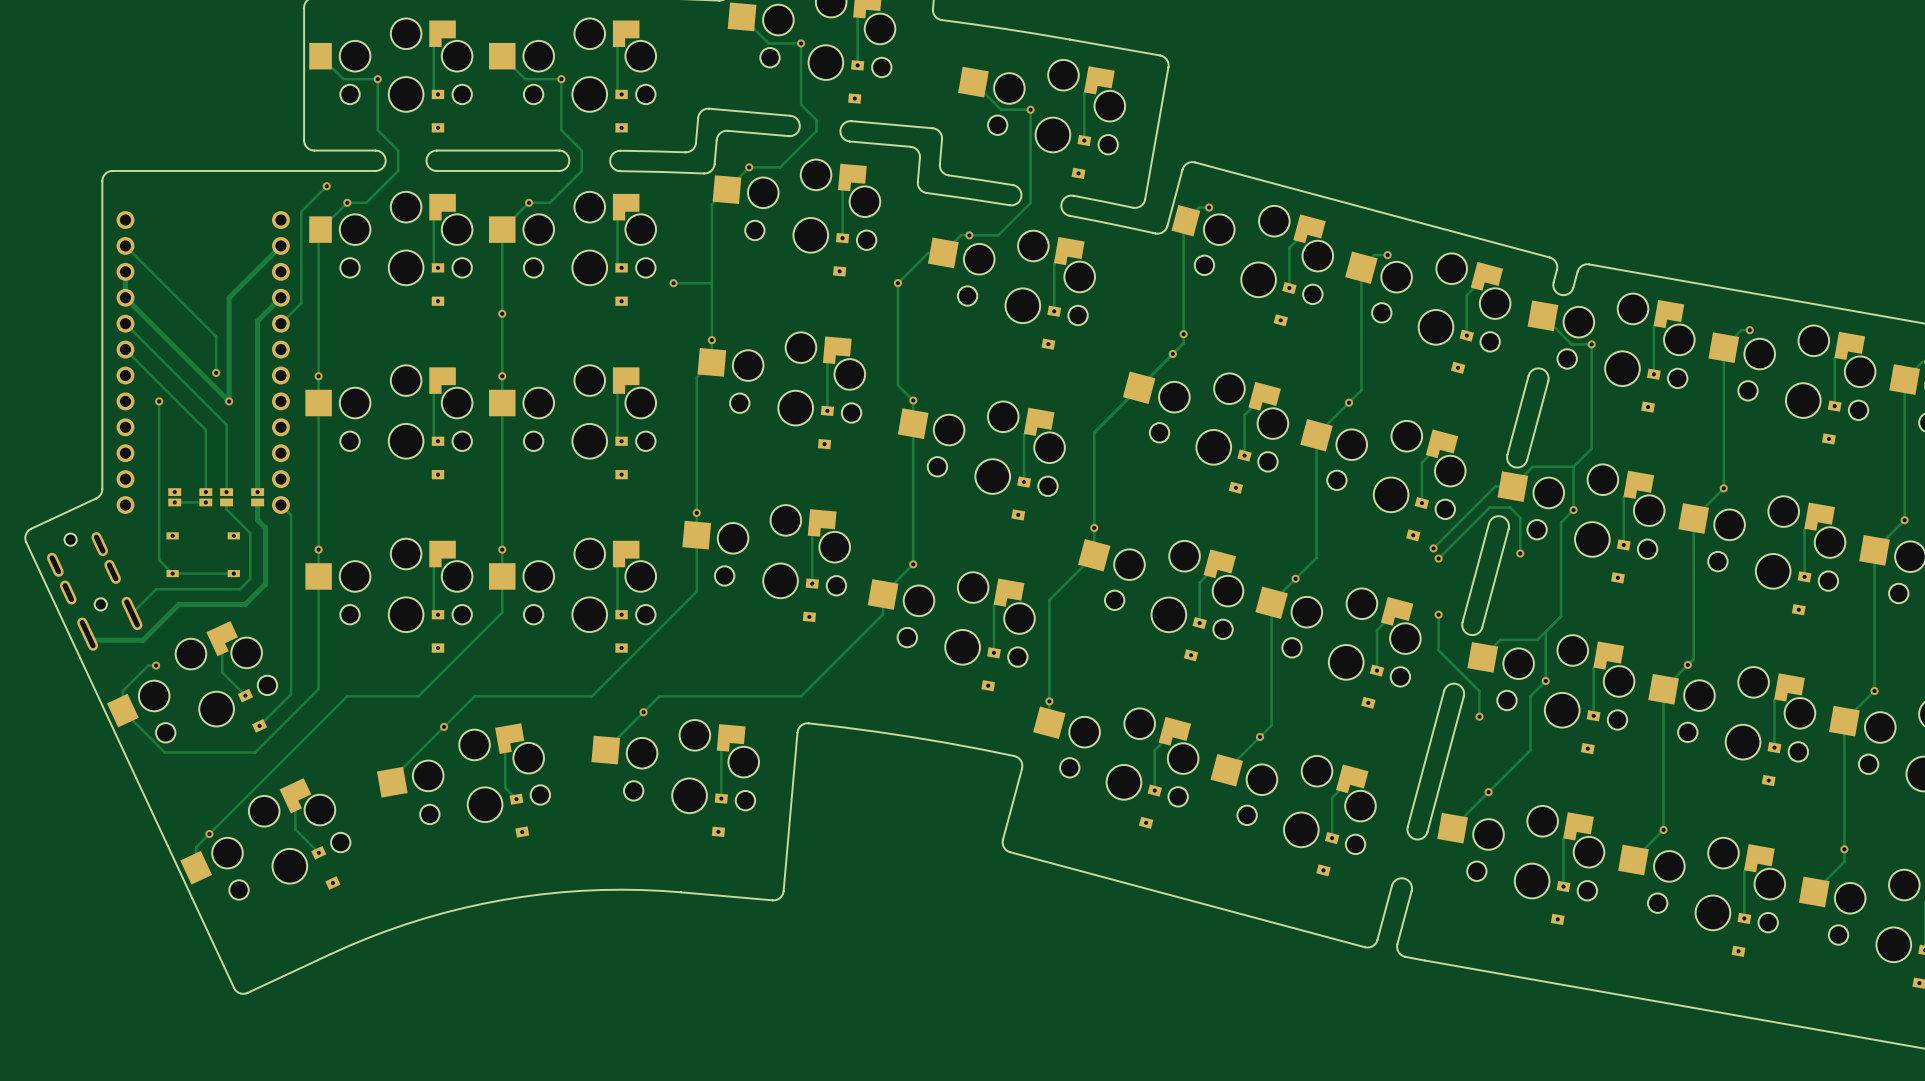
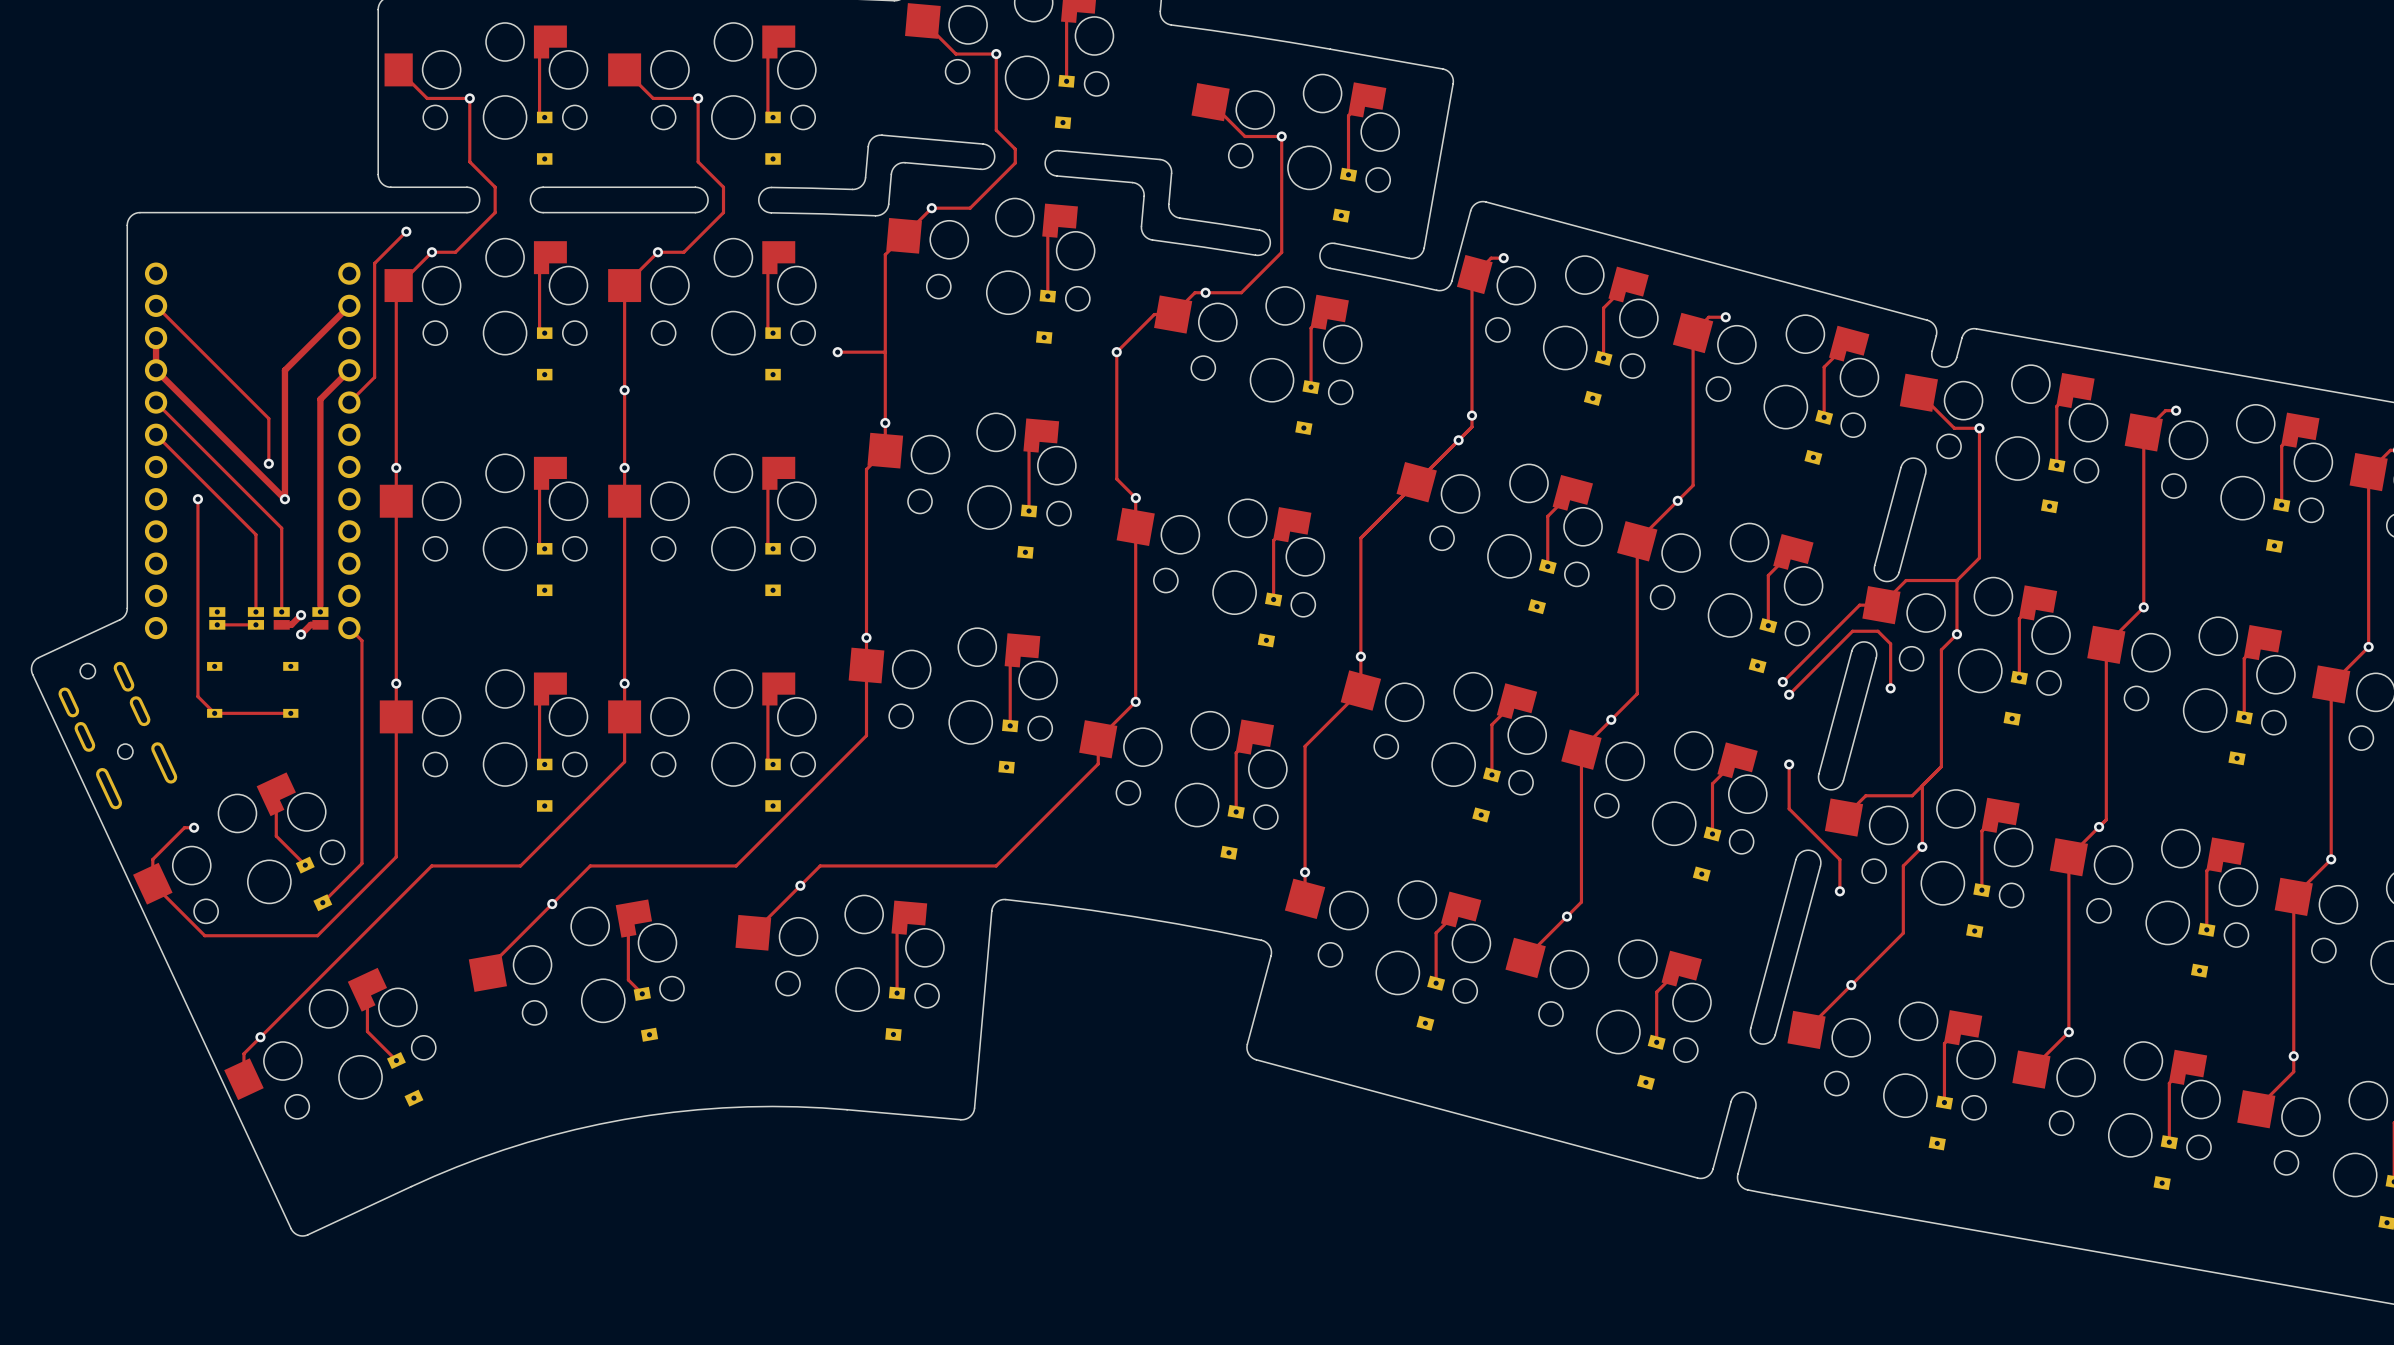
via: none -> (301, 615)
track: (226, 502) (226, 509) (250, 533) (250, 579) (240, 589) (156, 589) (132, 613) -> (281, 624) (291, 624) (301, 615)
track: (257, 502) (257, 520) (265, 527) (265, 584) (245, 604) (178, 604) (143, 640) (93, 640) (87, 634) -> (320, 624) (310, 624) (301, 634)
via: none -> (301, 634)

